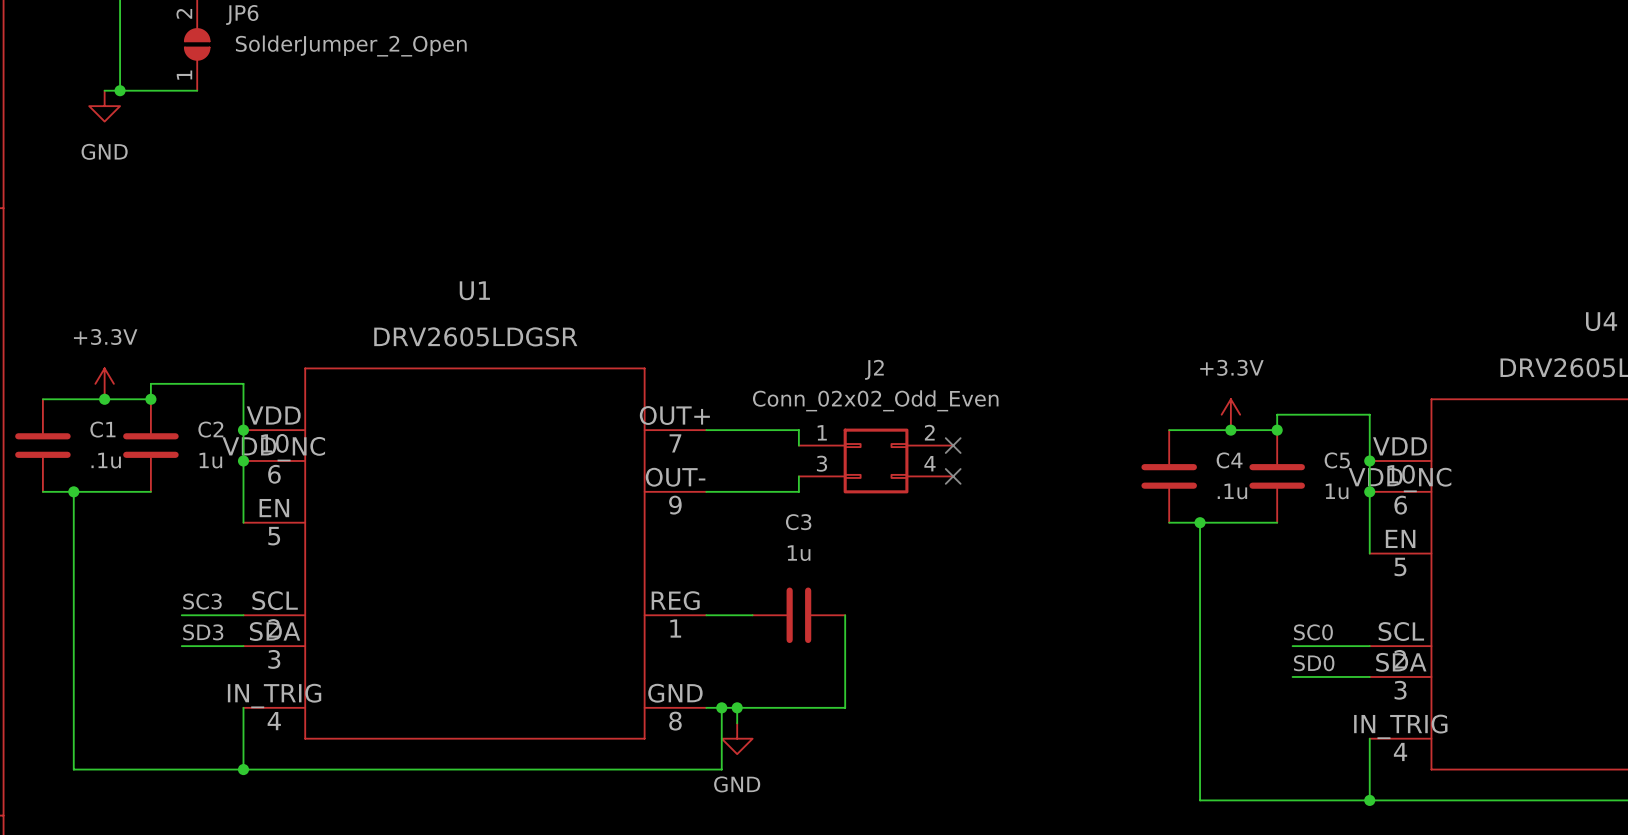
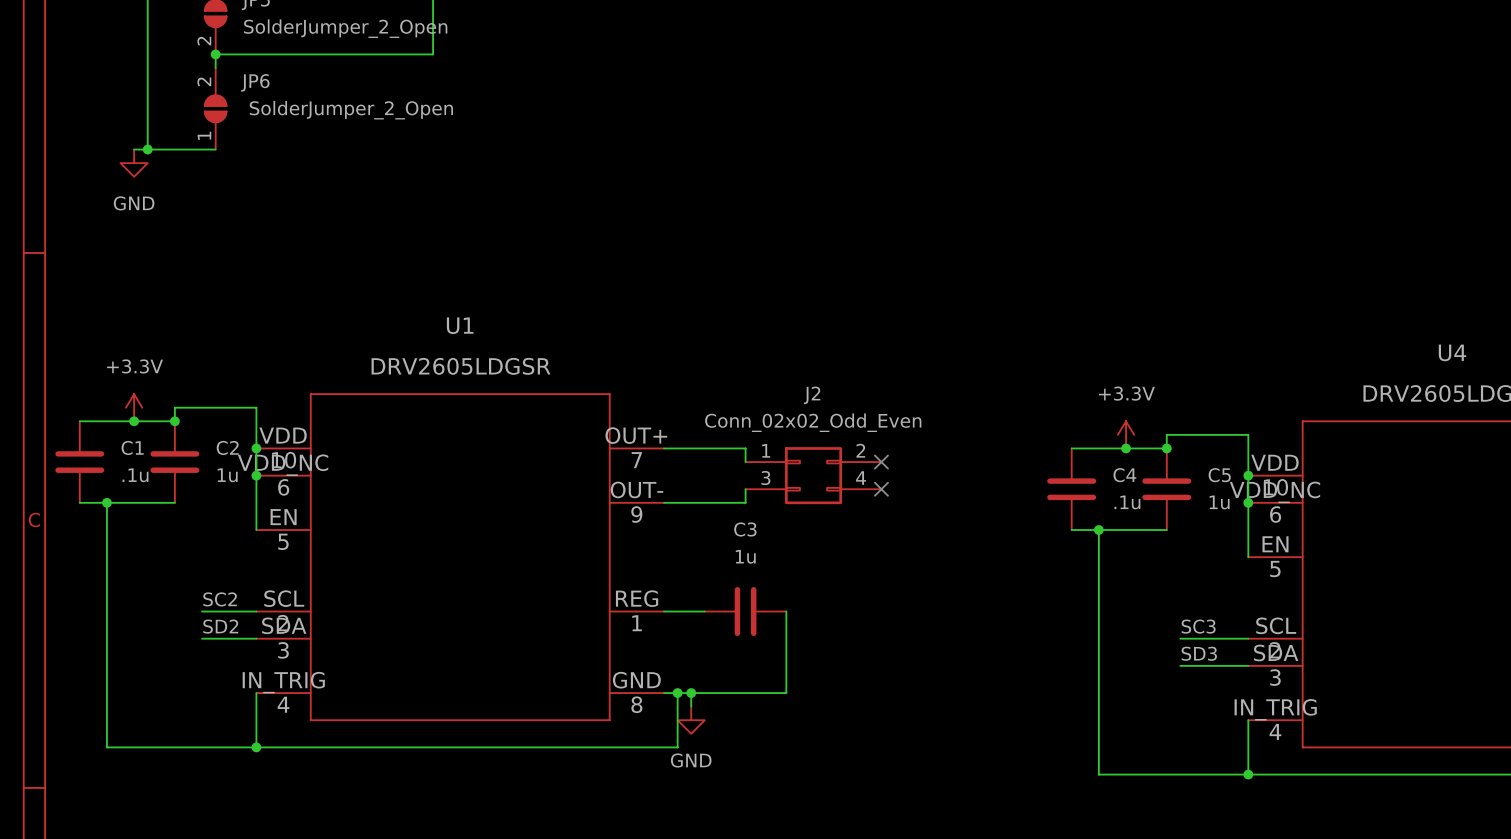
label: SC3 (202, 601) -> SC2 (220, 599)
label: SD3 (203, 632) -> SD2 (220, 626)
label: SC0 (1313, 632) -> SC3 (1198, 626)
label: SD0 (1314, 663) -> SD3 (1199, 653)

